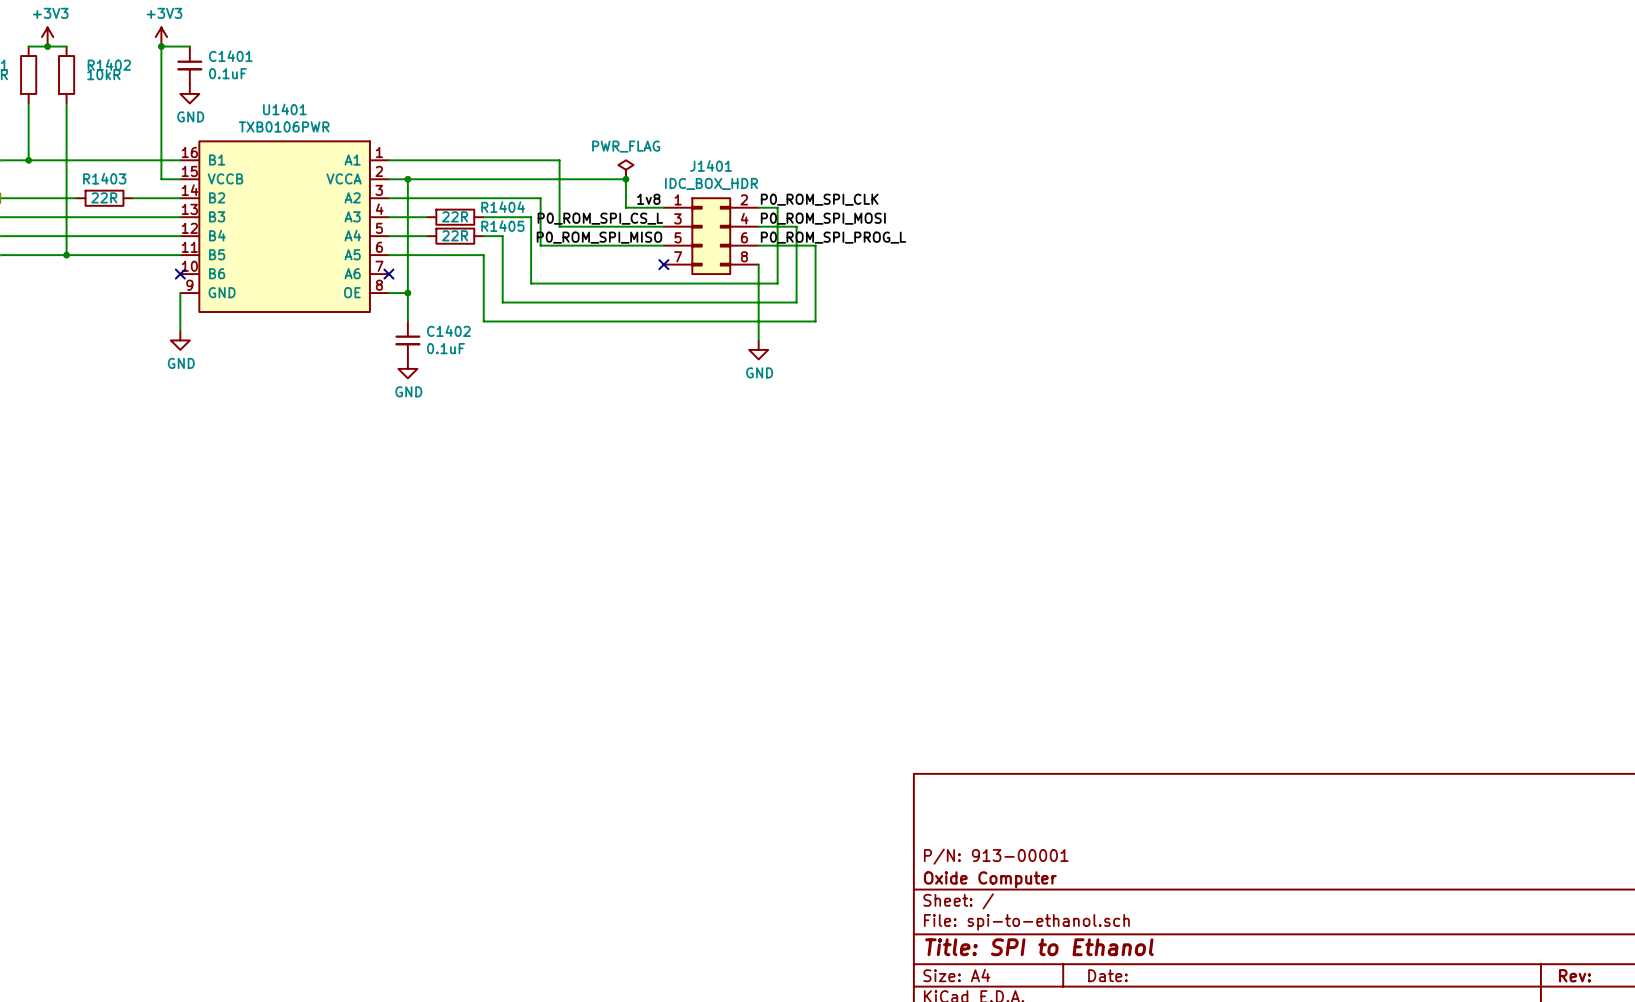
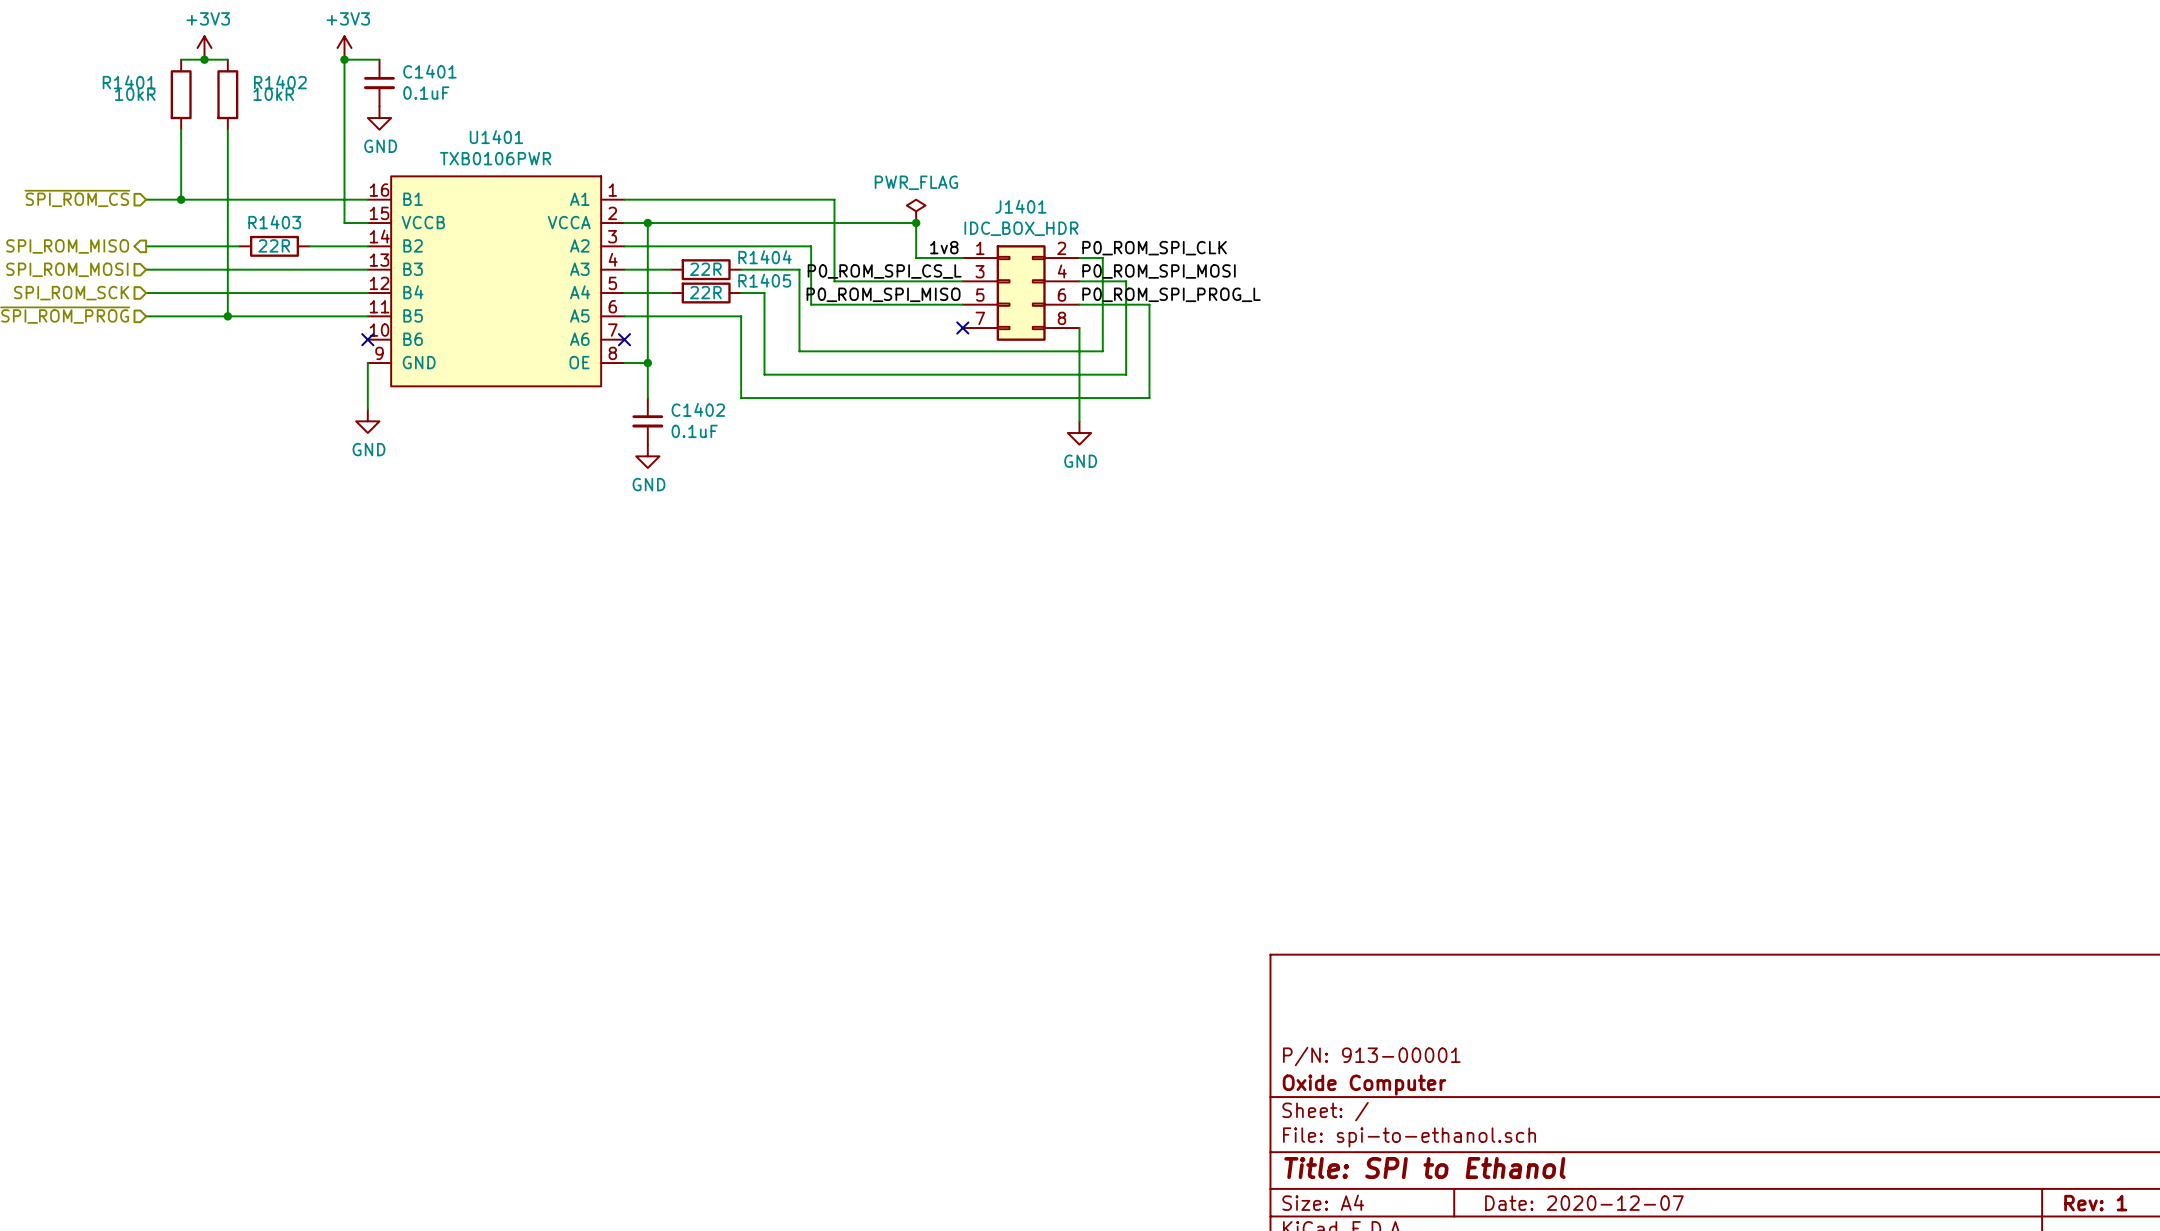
title block: Date: (1107, 975) -> Date: 2020-12-07 (1584, 1203)
title block: Rev: (1574, 975) -> Rev: 1 (2095, 1203)

